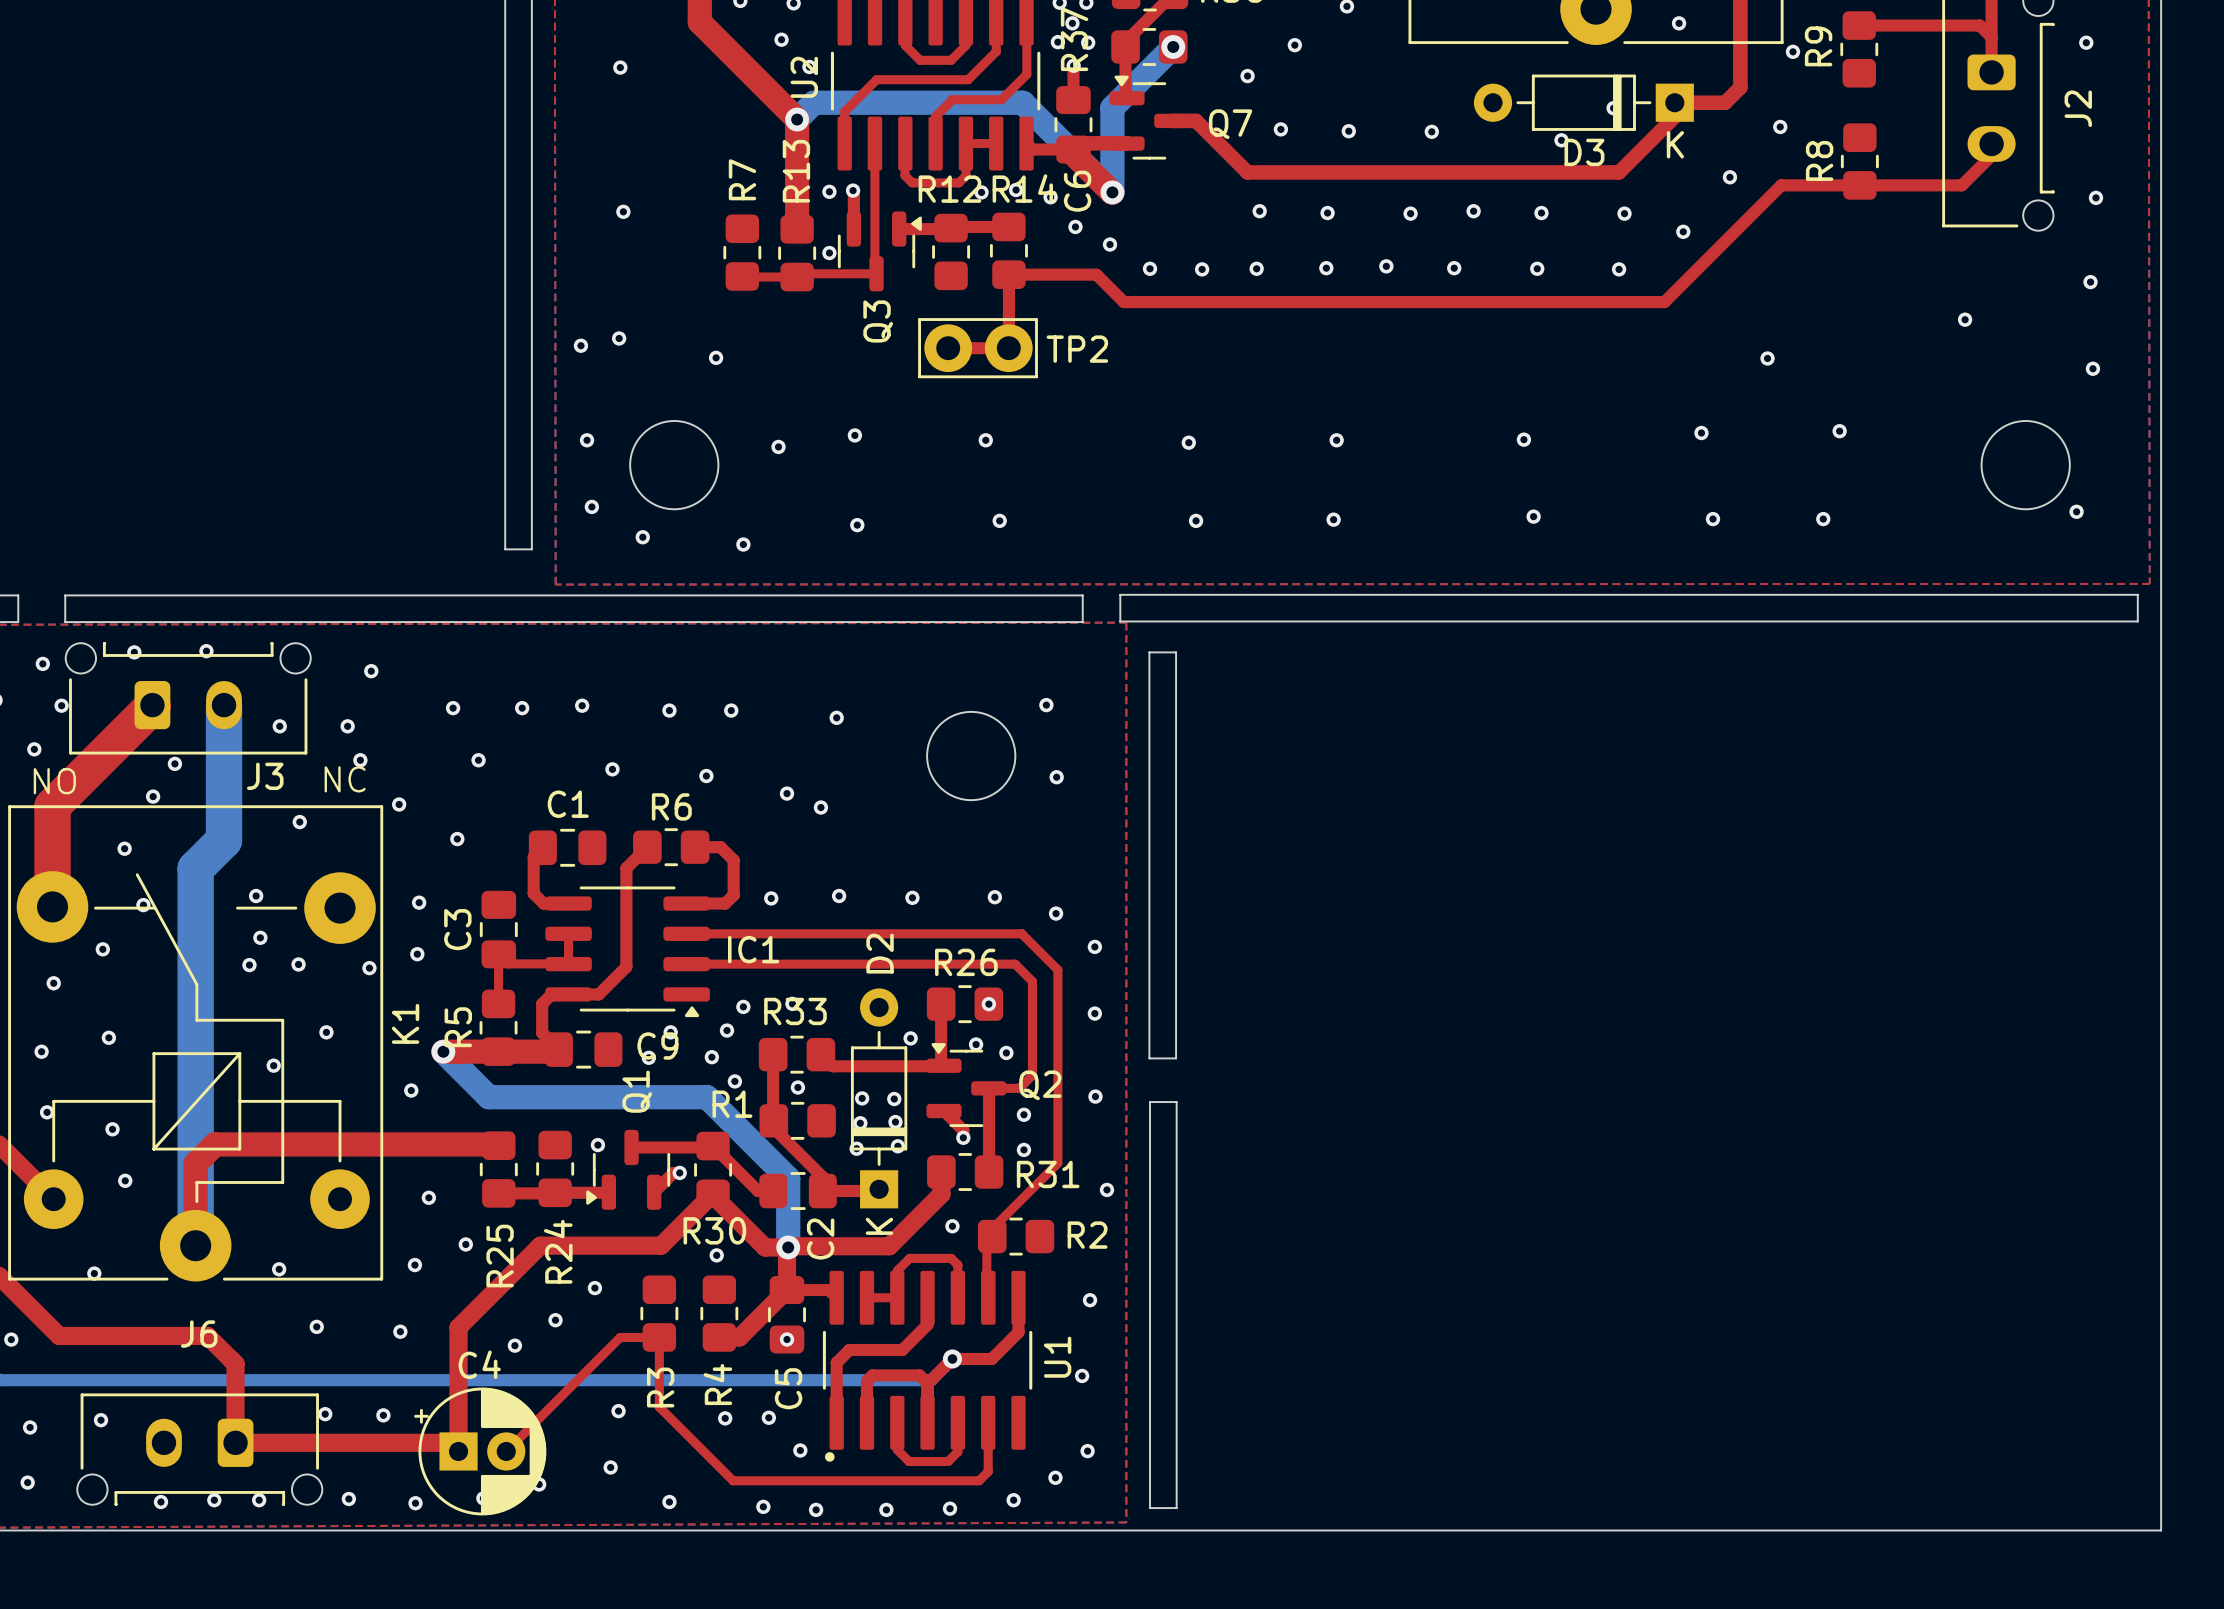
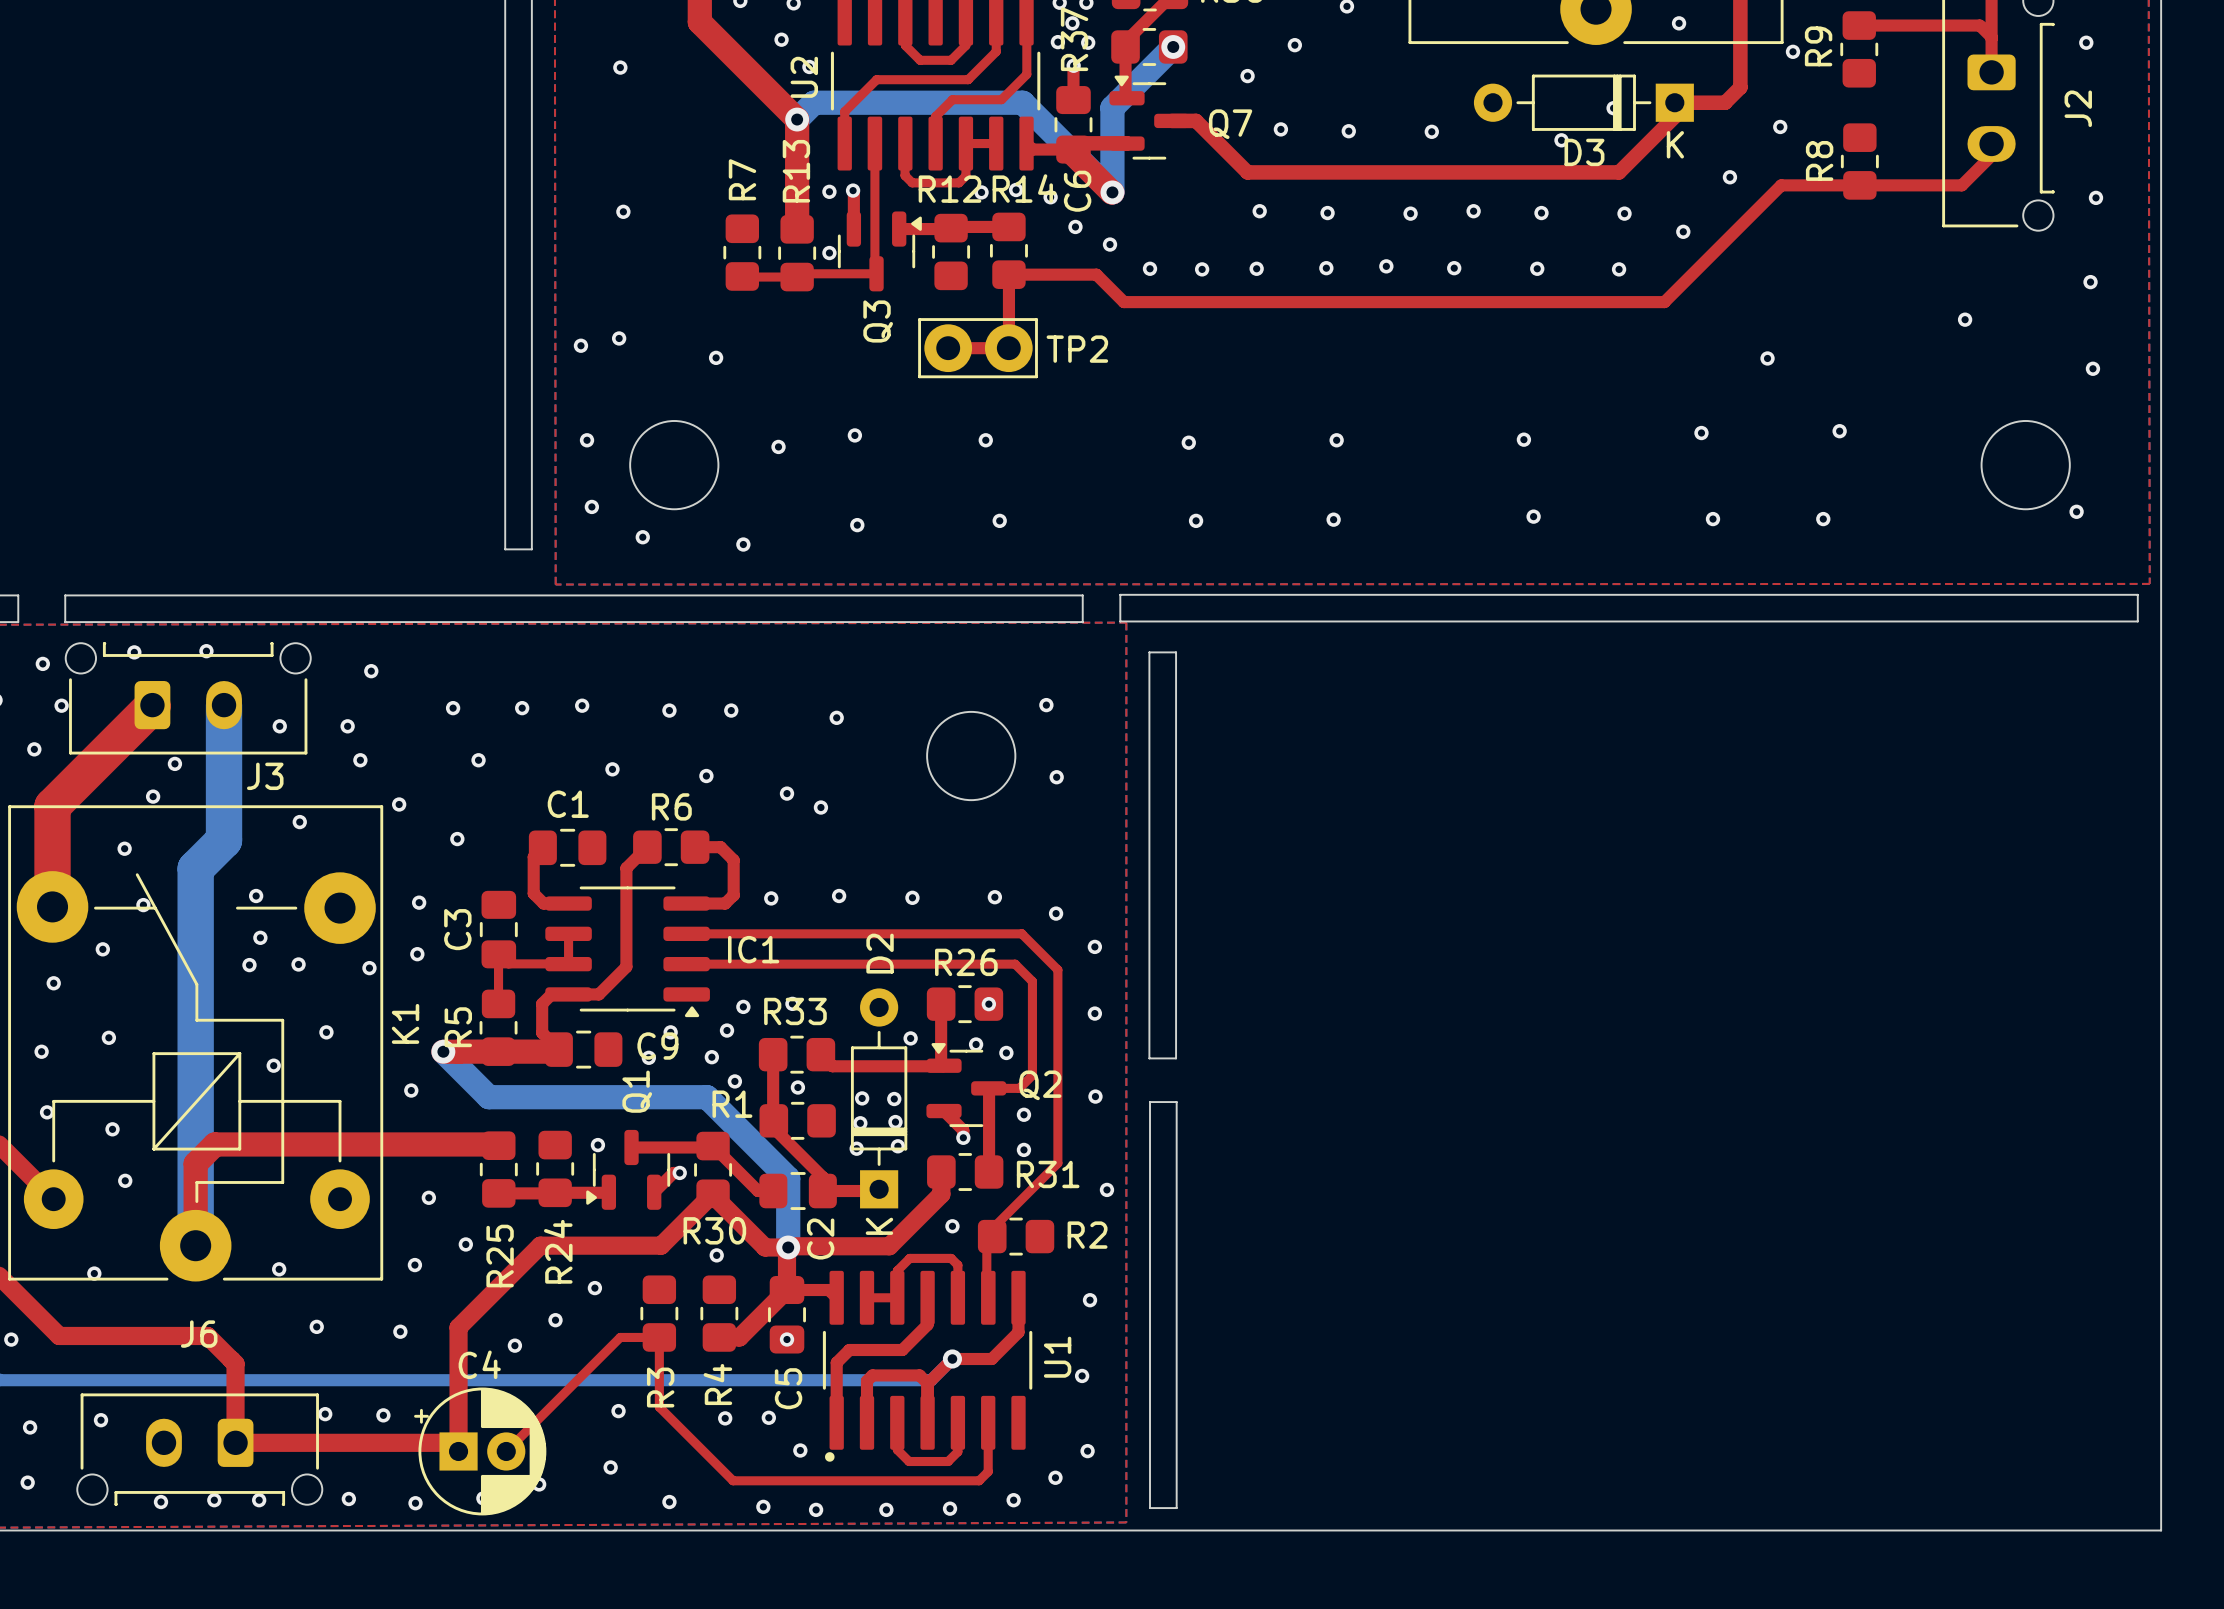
text: NC (345, 779) -> none
text: NO (54, 781) -> none

